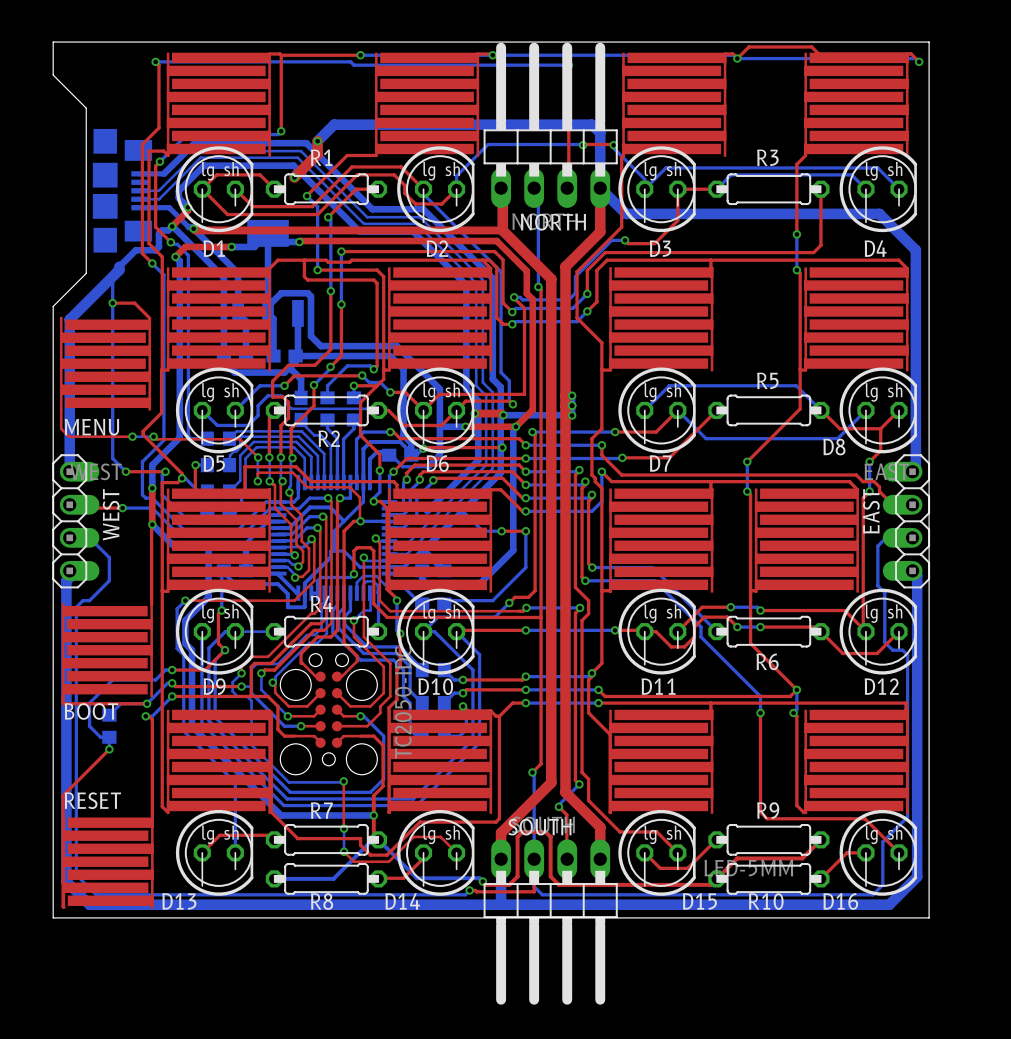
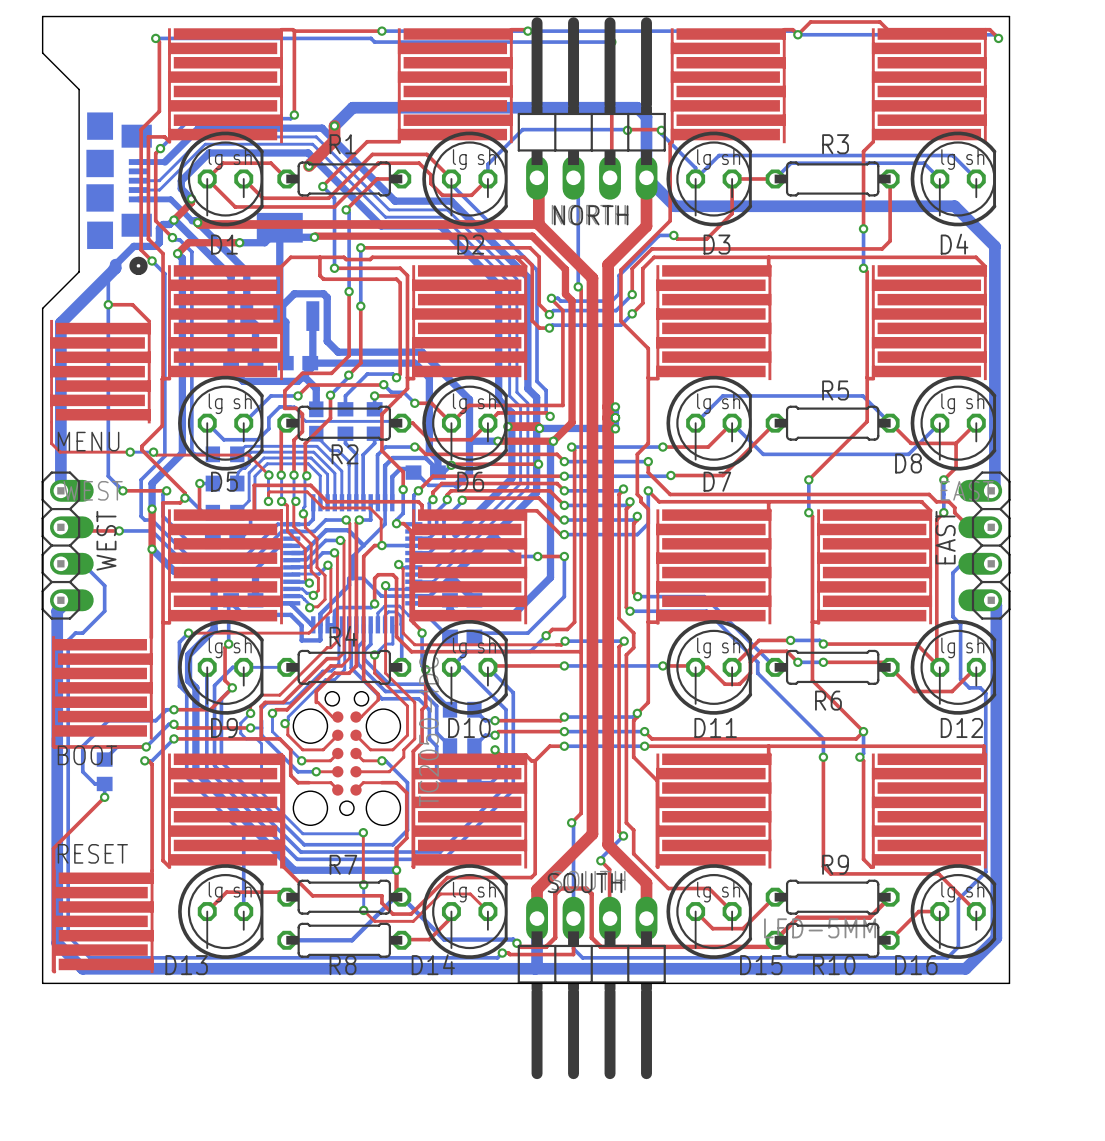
part footprint: [92, 128, 153, 253] -> [86, 112, 152, 276]

